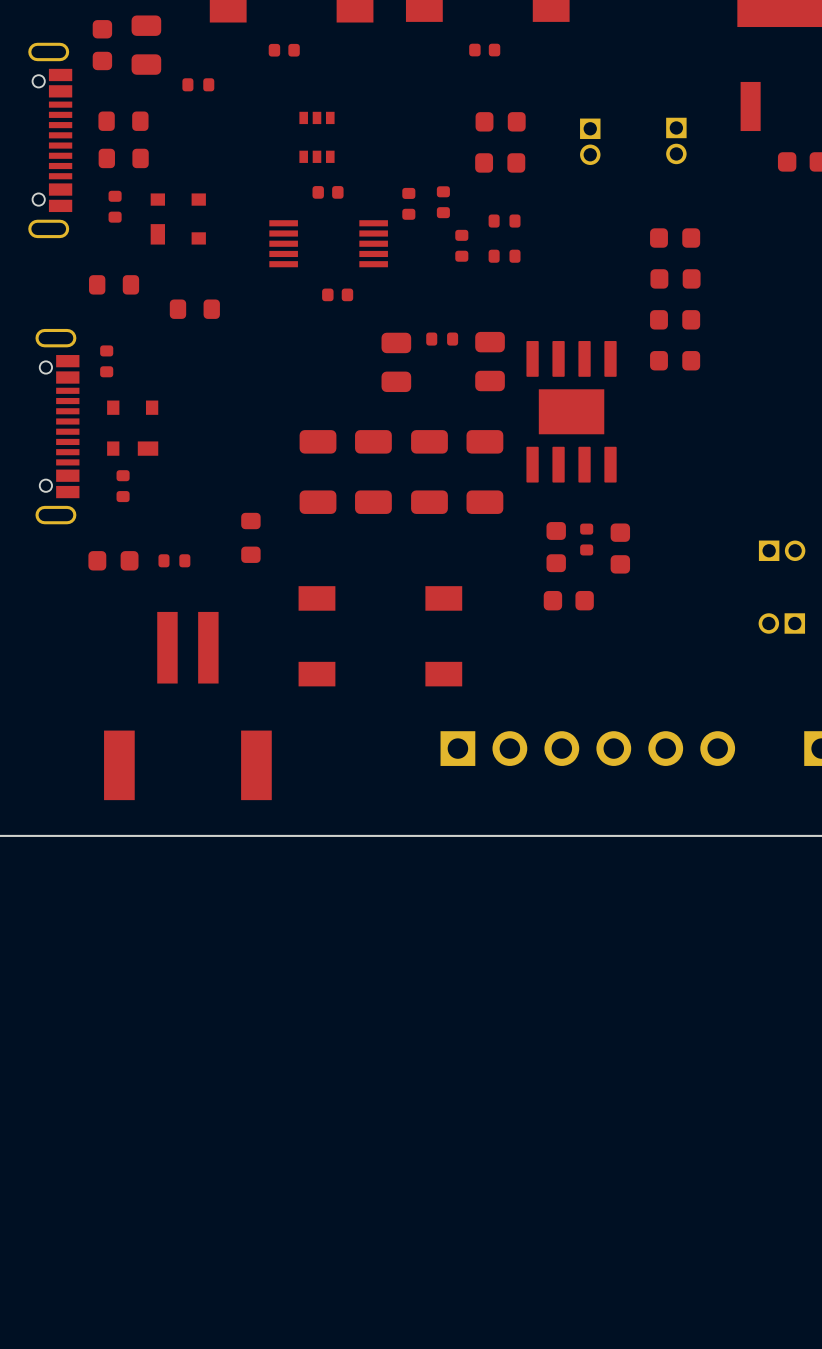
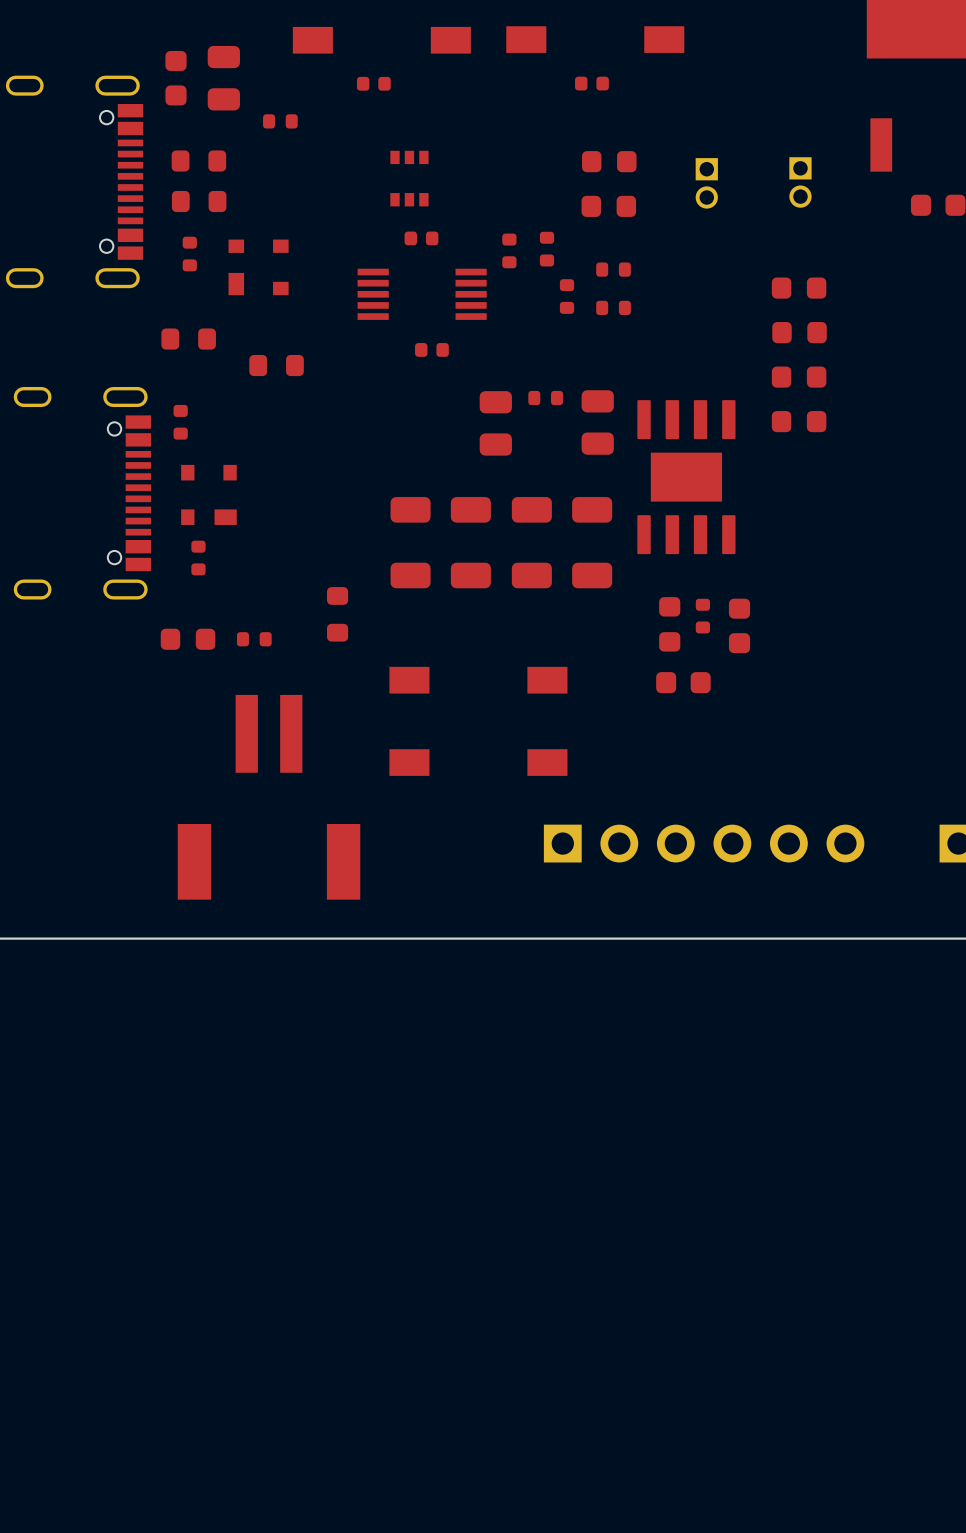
part: (782, 550) -> none
part: (781, 623) -> none

